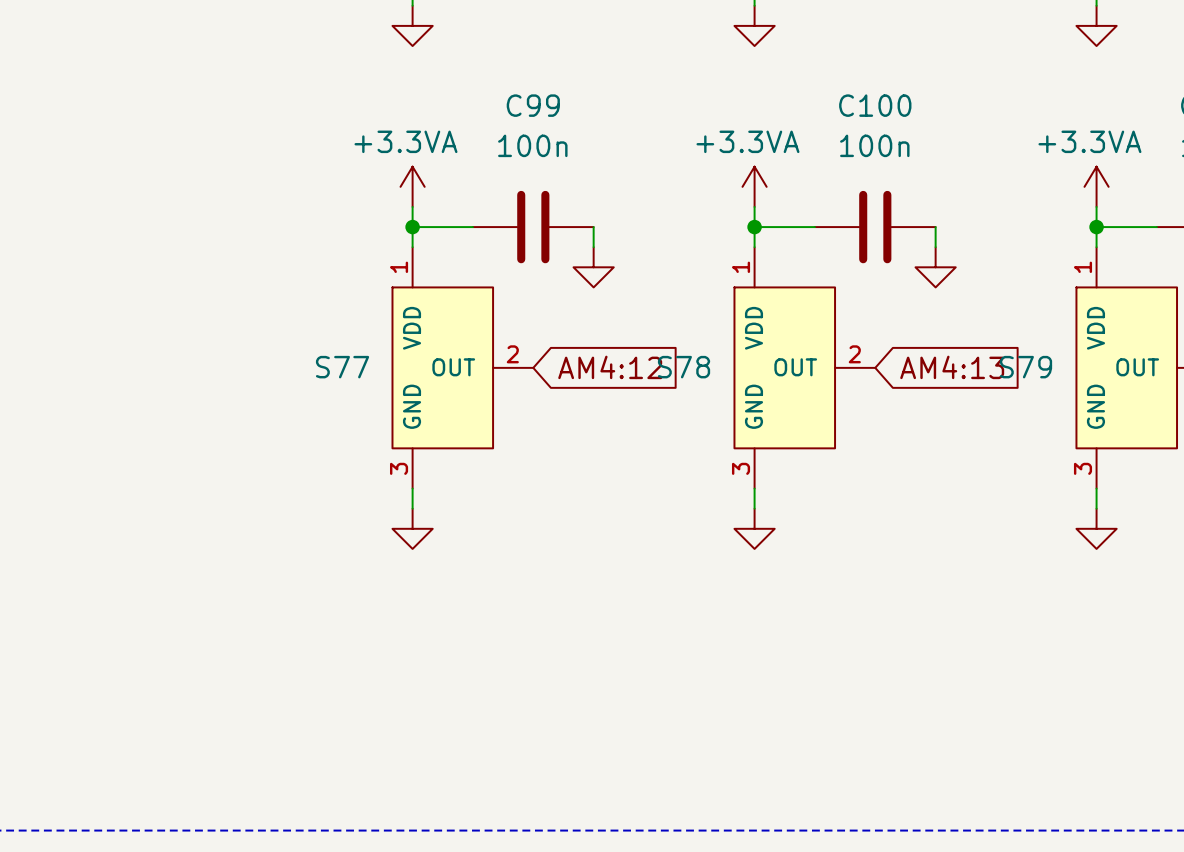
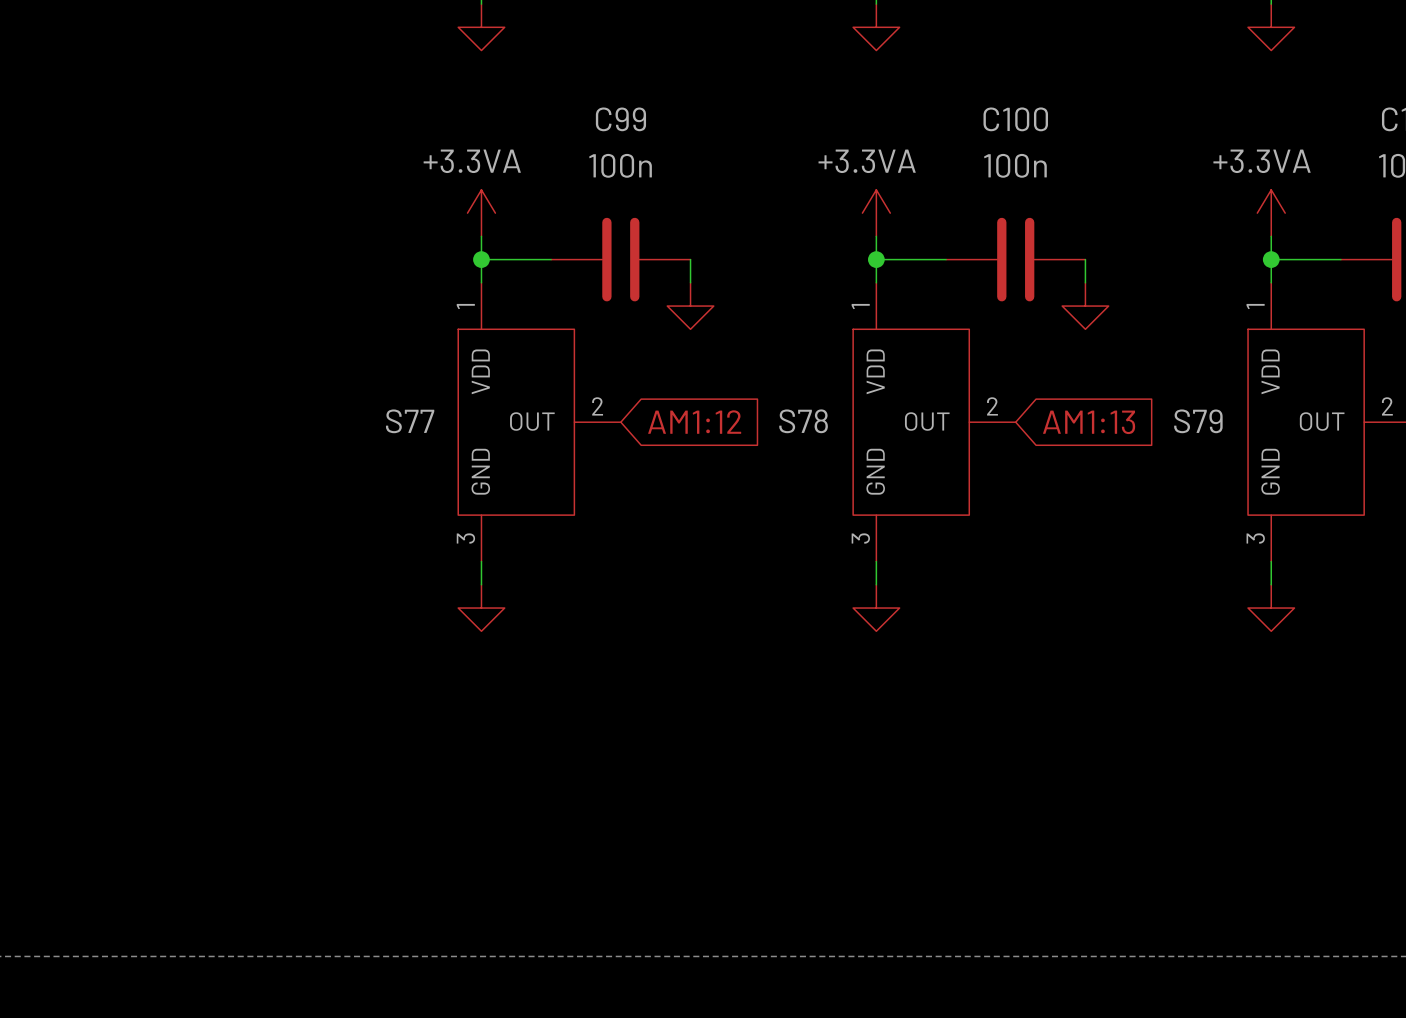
global label: AM4:12 (610, 367) -> AM1:12 (694, 422)
global label: AM4:13 (952, 367) -> AM1:13 (1089, 422)

